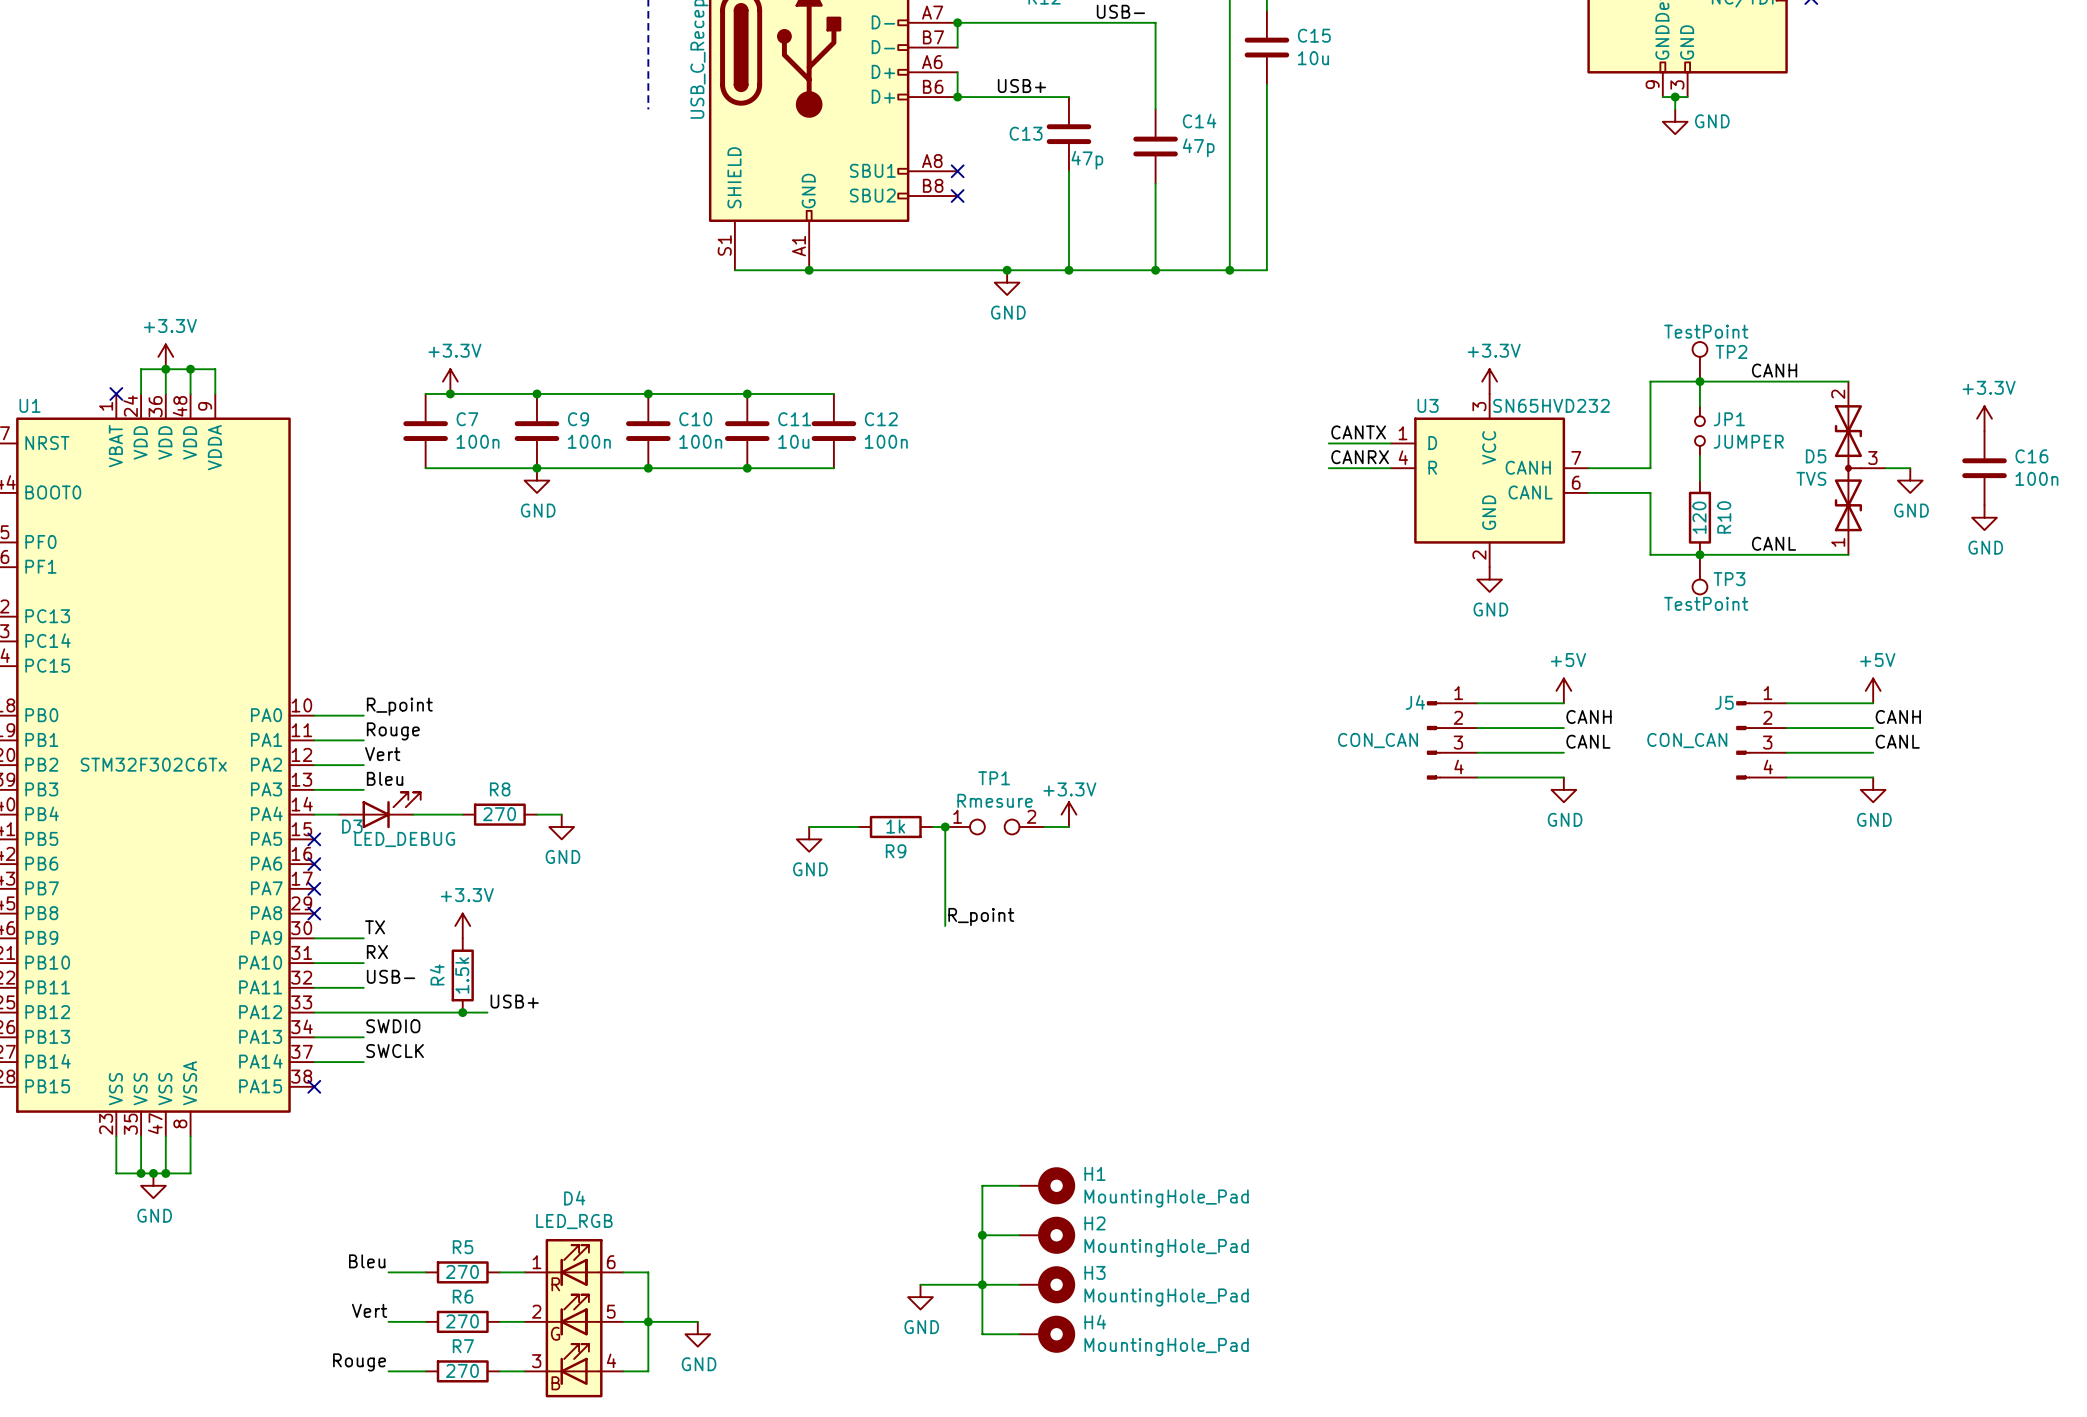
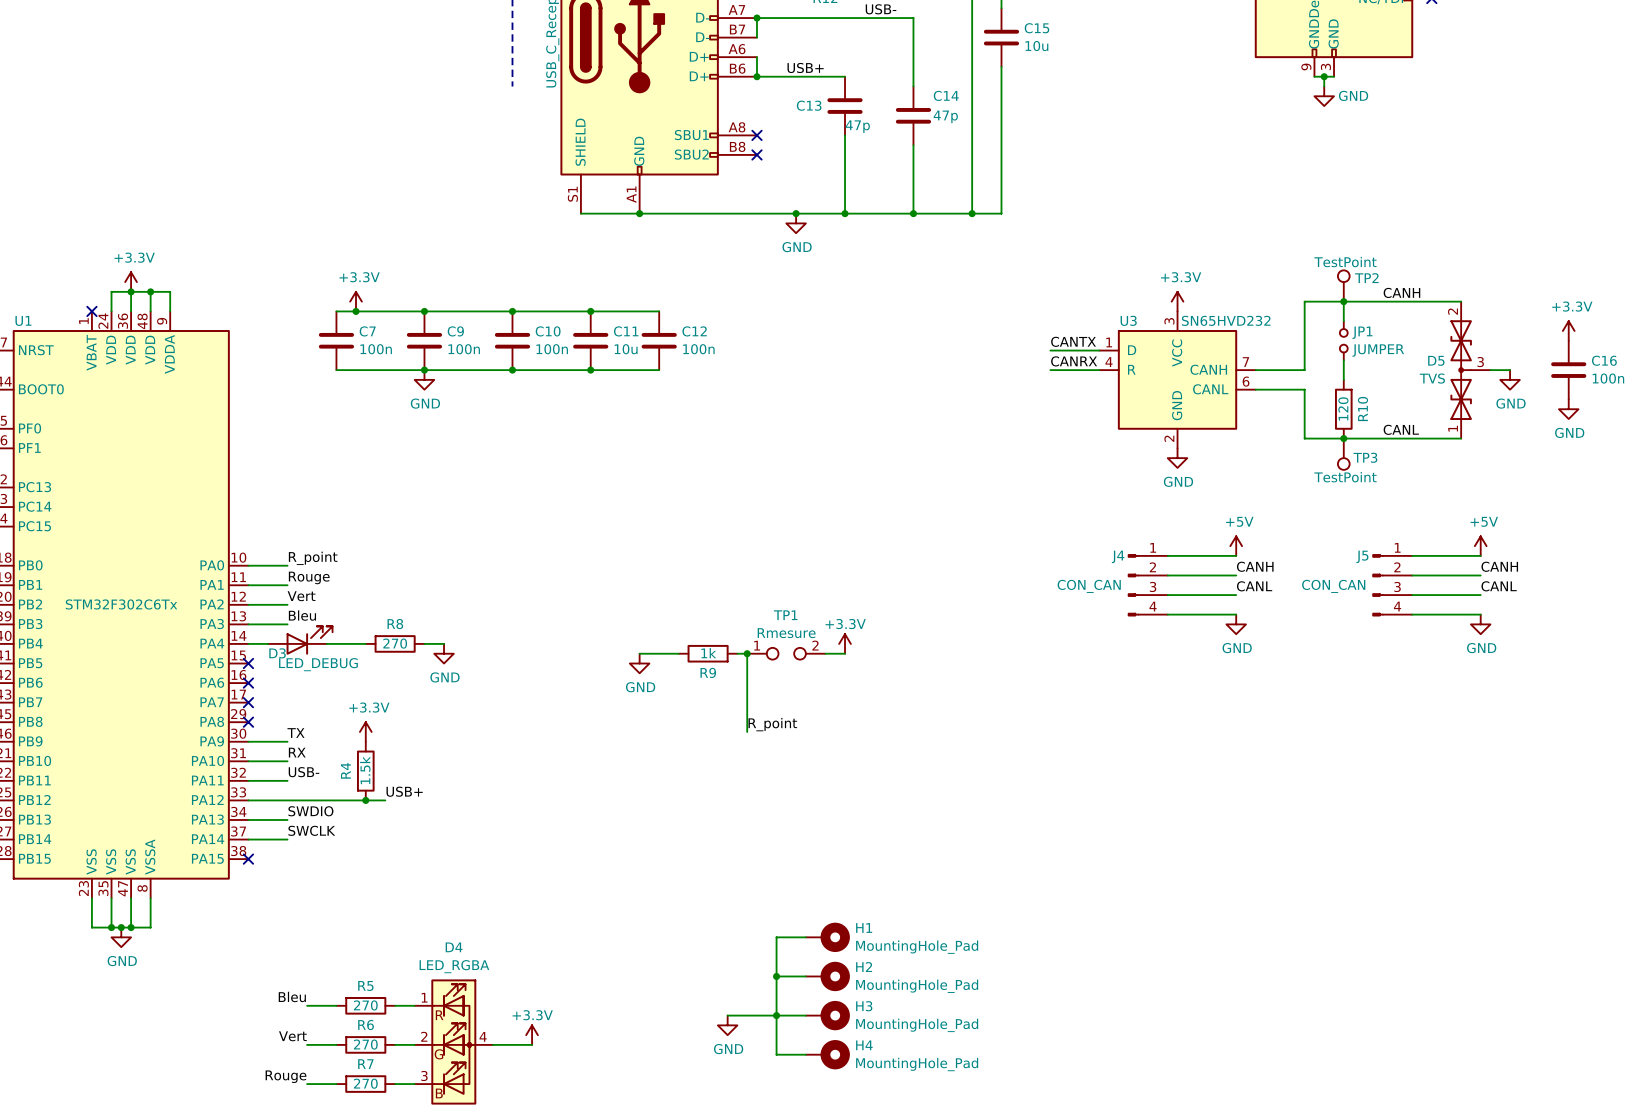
D4 value: LED_RGB (574, 1221) -> LED_RGBA (454, 966)
D4 symbol: [524, 1238, 624, 1398] -> [414, 979, 493, 1105]
wire: (623, 1272) (648, 1272) (648, 1371) (623, 1371) -> none
power symbol: none -> +3.3V (532, 1035)
junction: (648, 1321) -> none
wire: (673, 1321) (697, 1321) -> none
power symbol: GND (697, 1334) -> none

